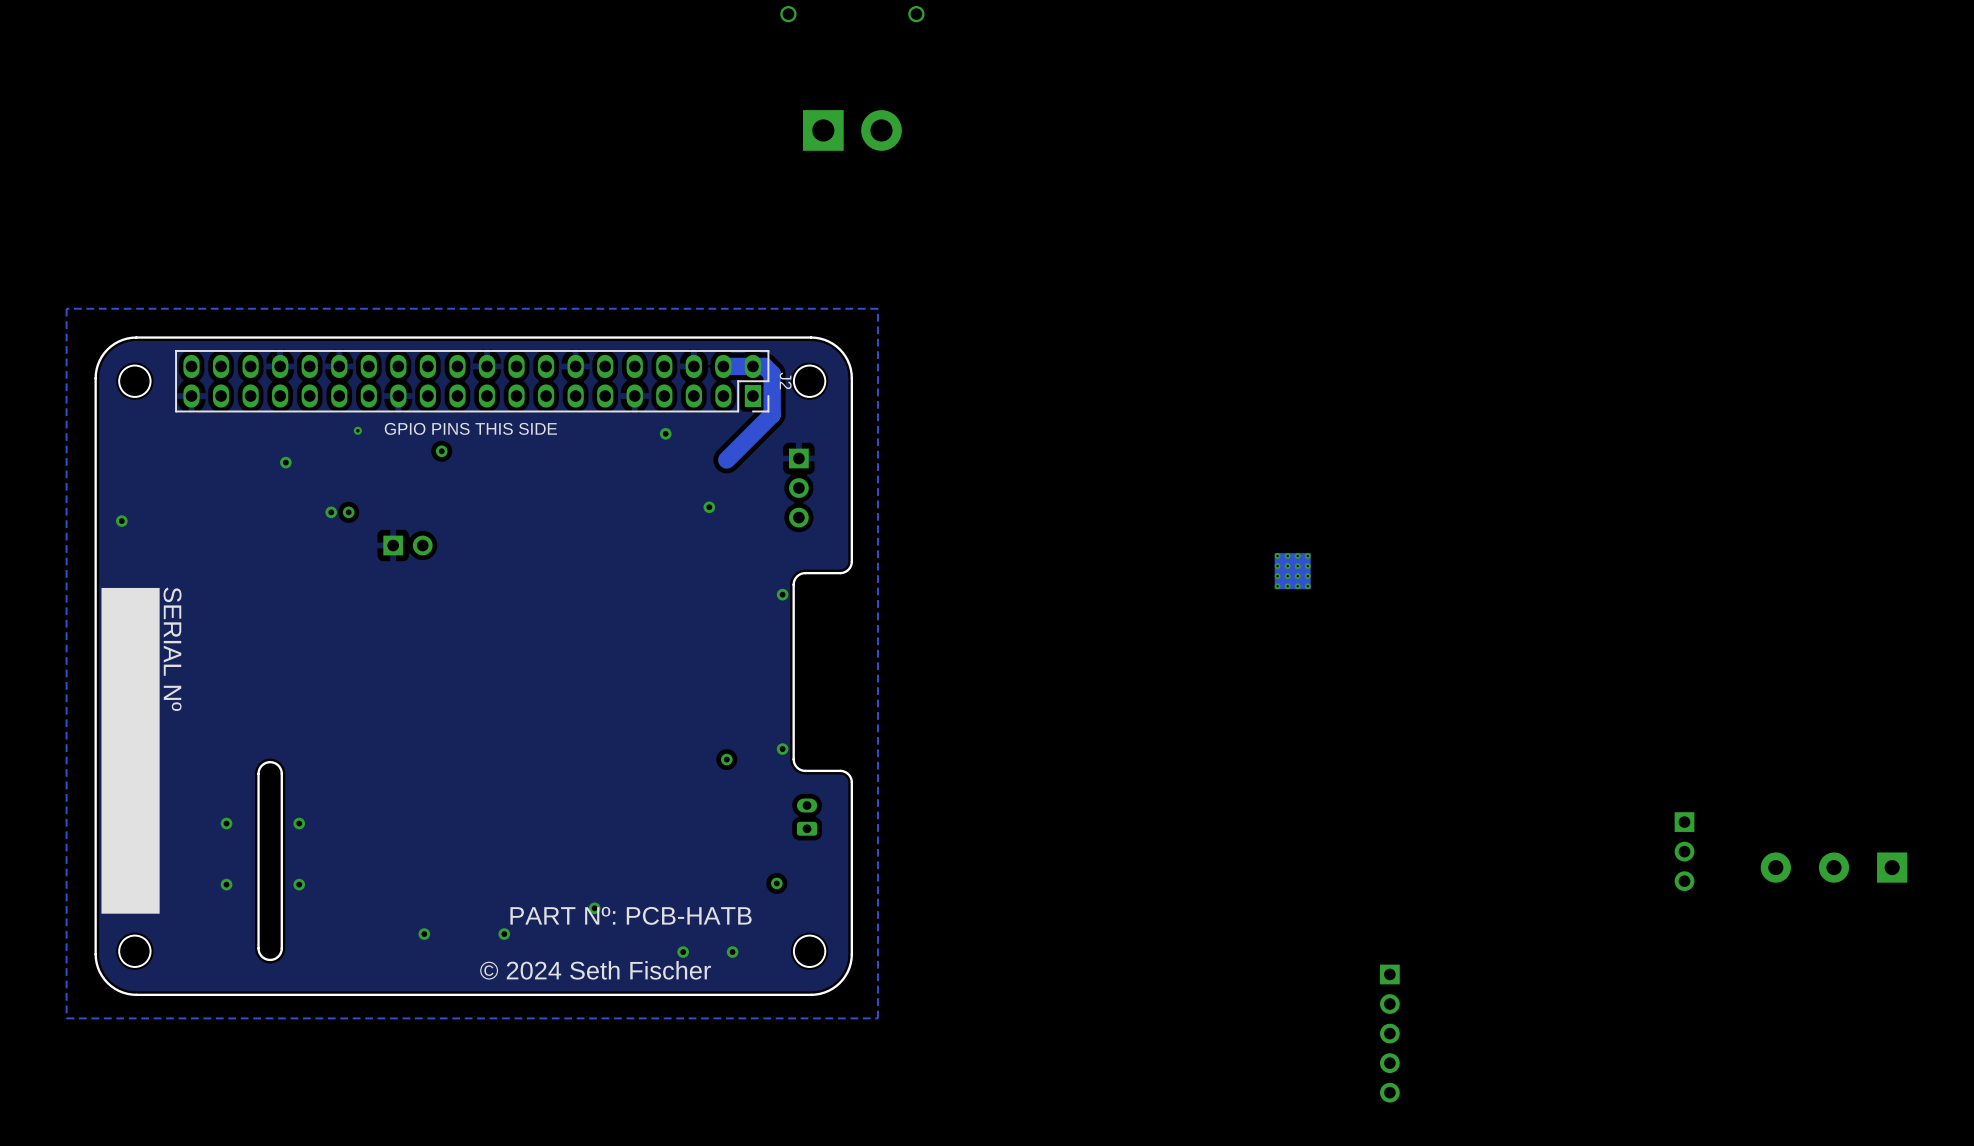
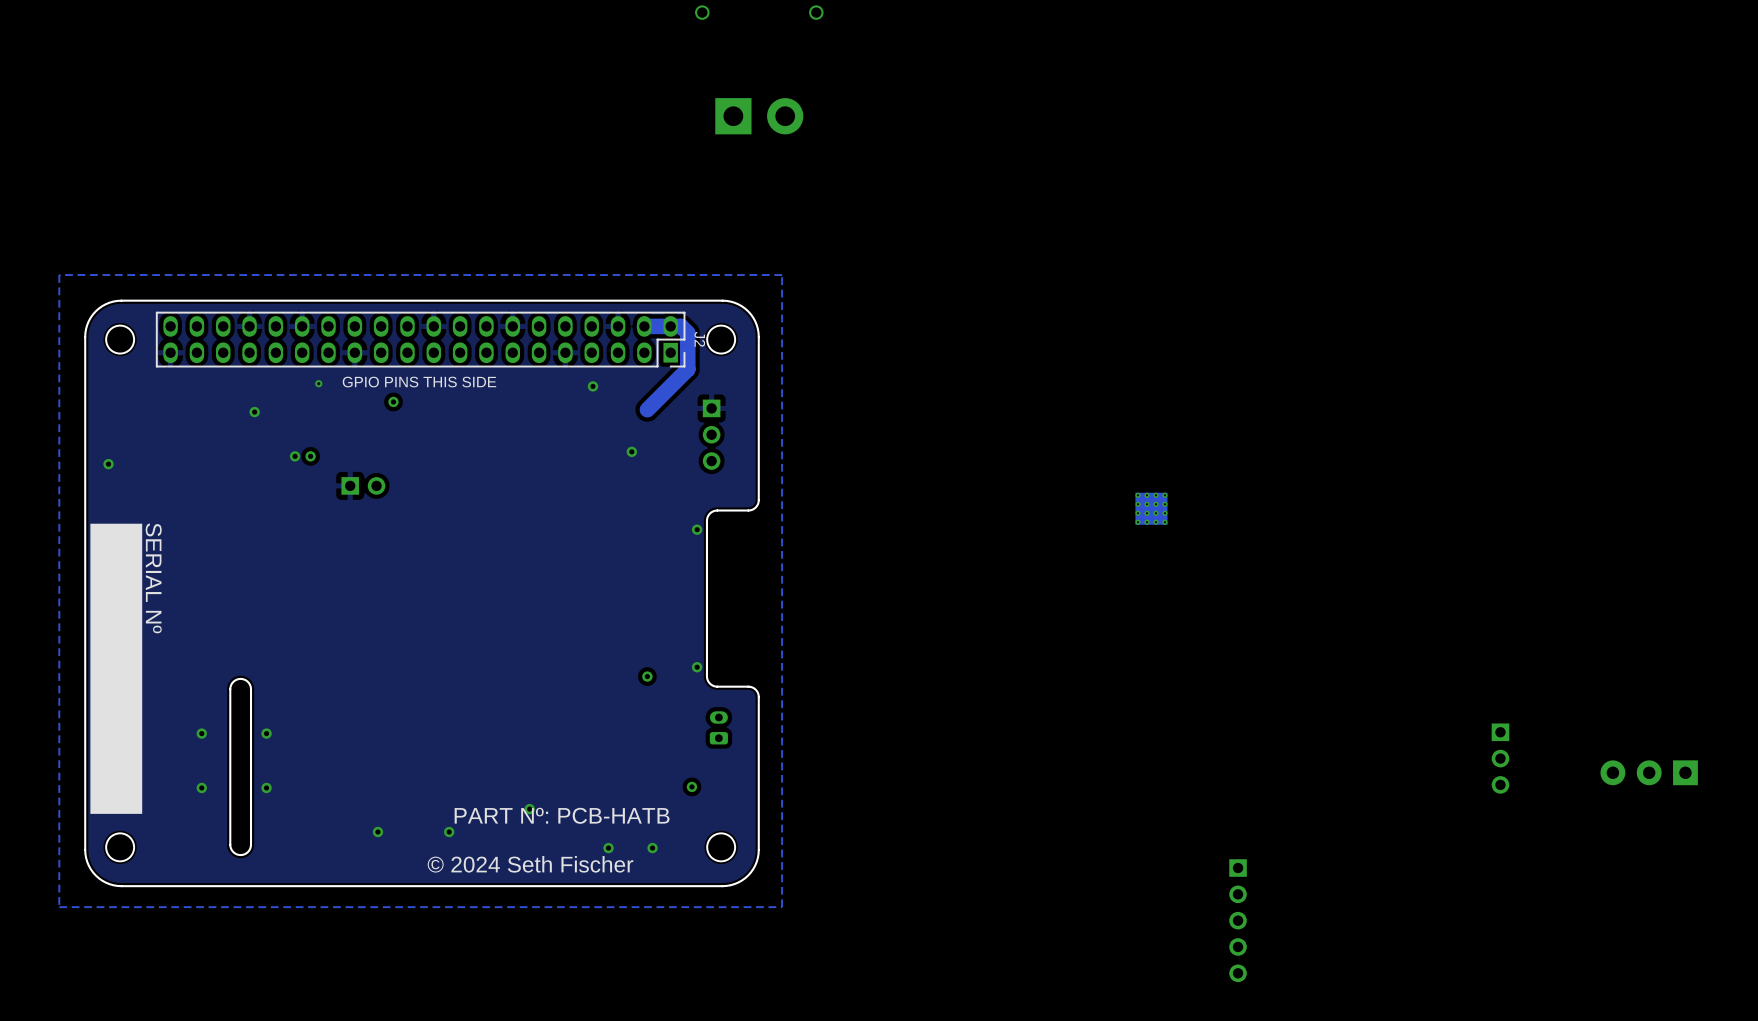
part: (1834, 867) -> none
part: none -> (1649, 772)

